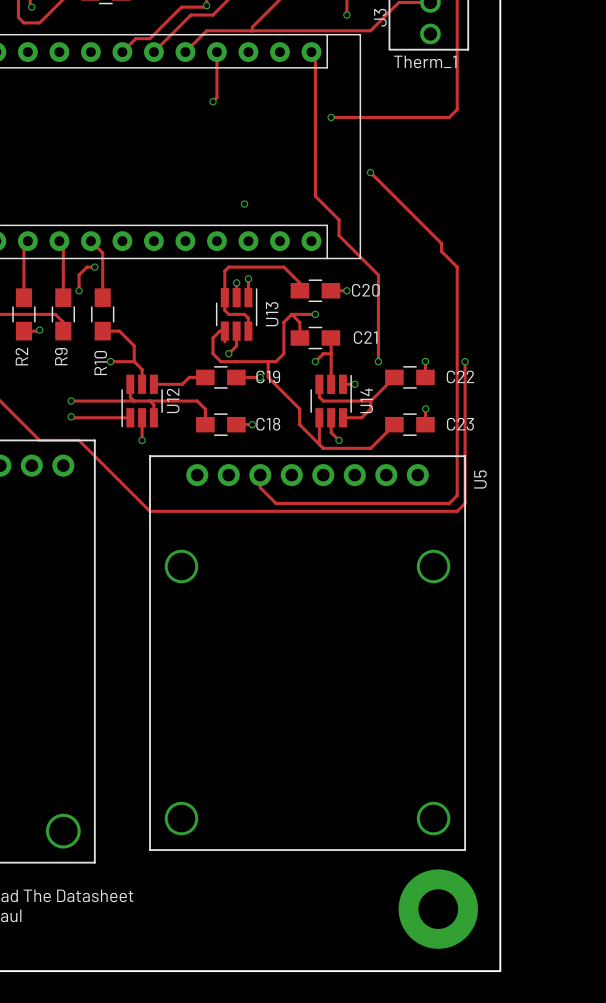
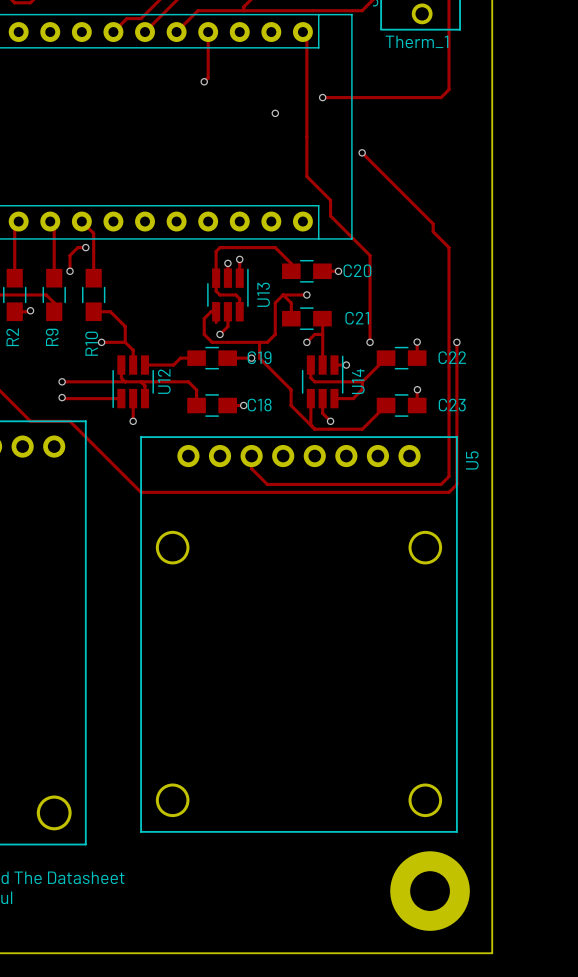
via: none -> (275, 113)
via: (244, 204) -> none

